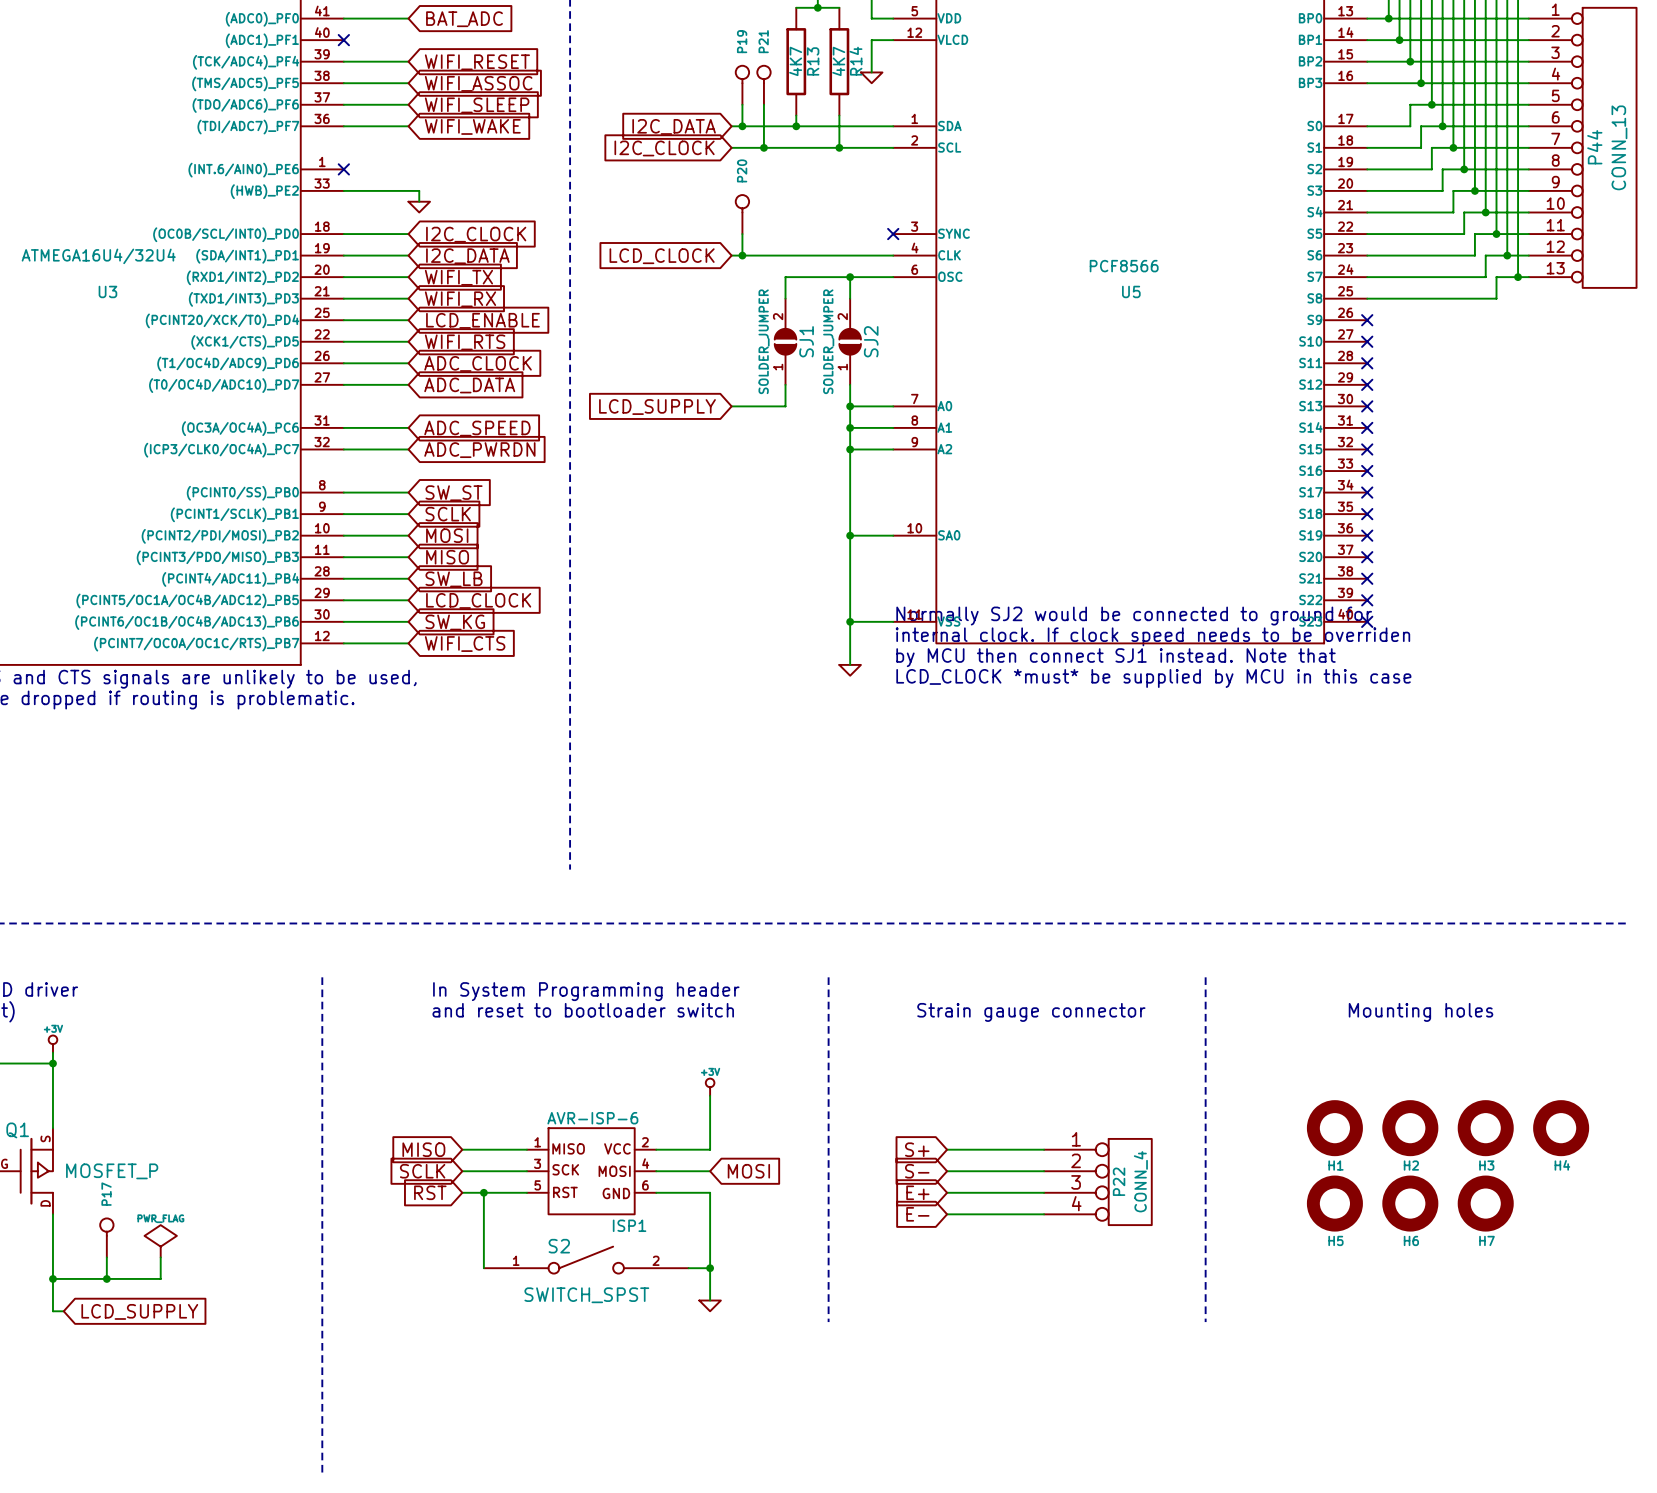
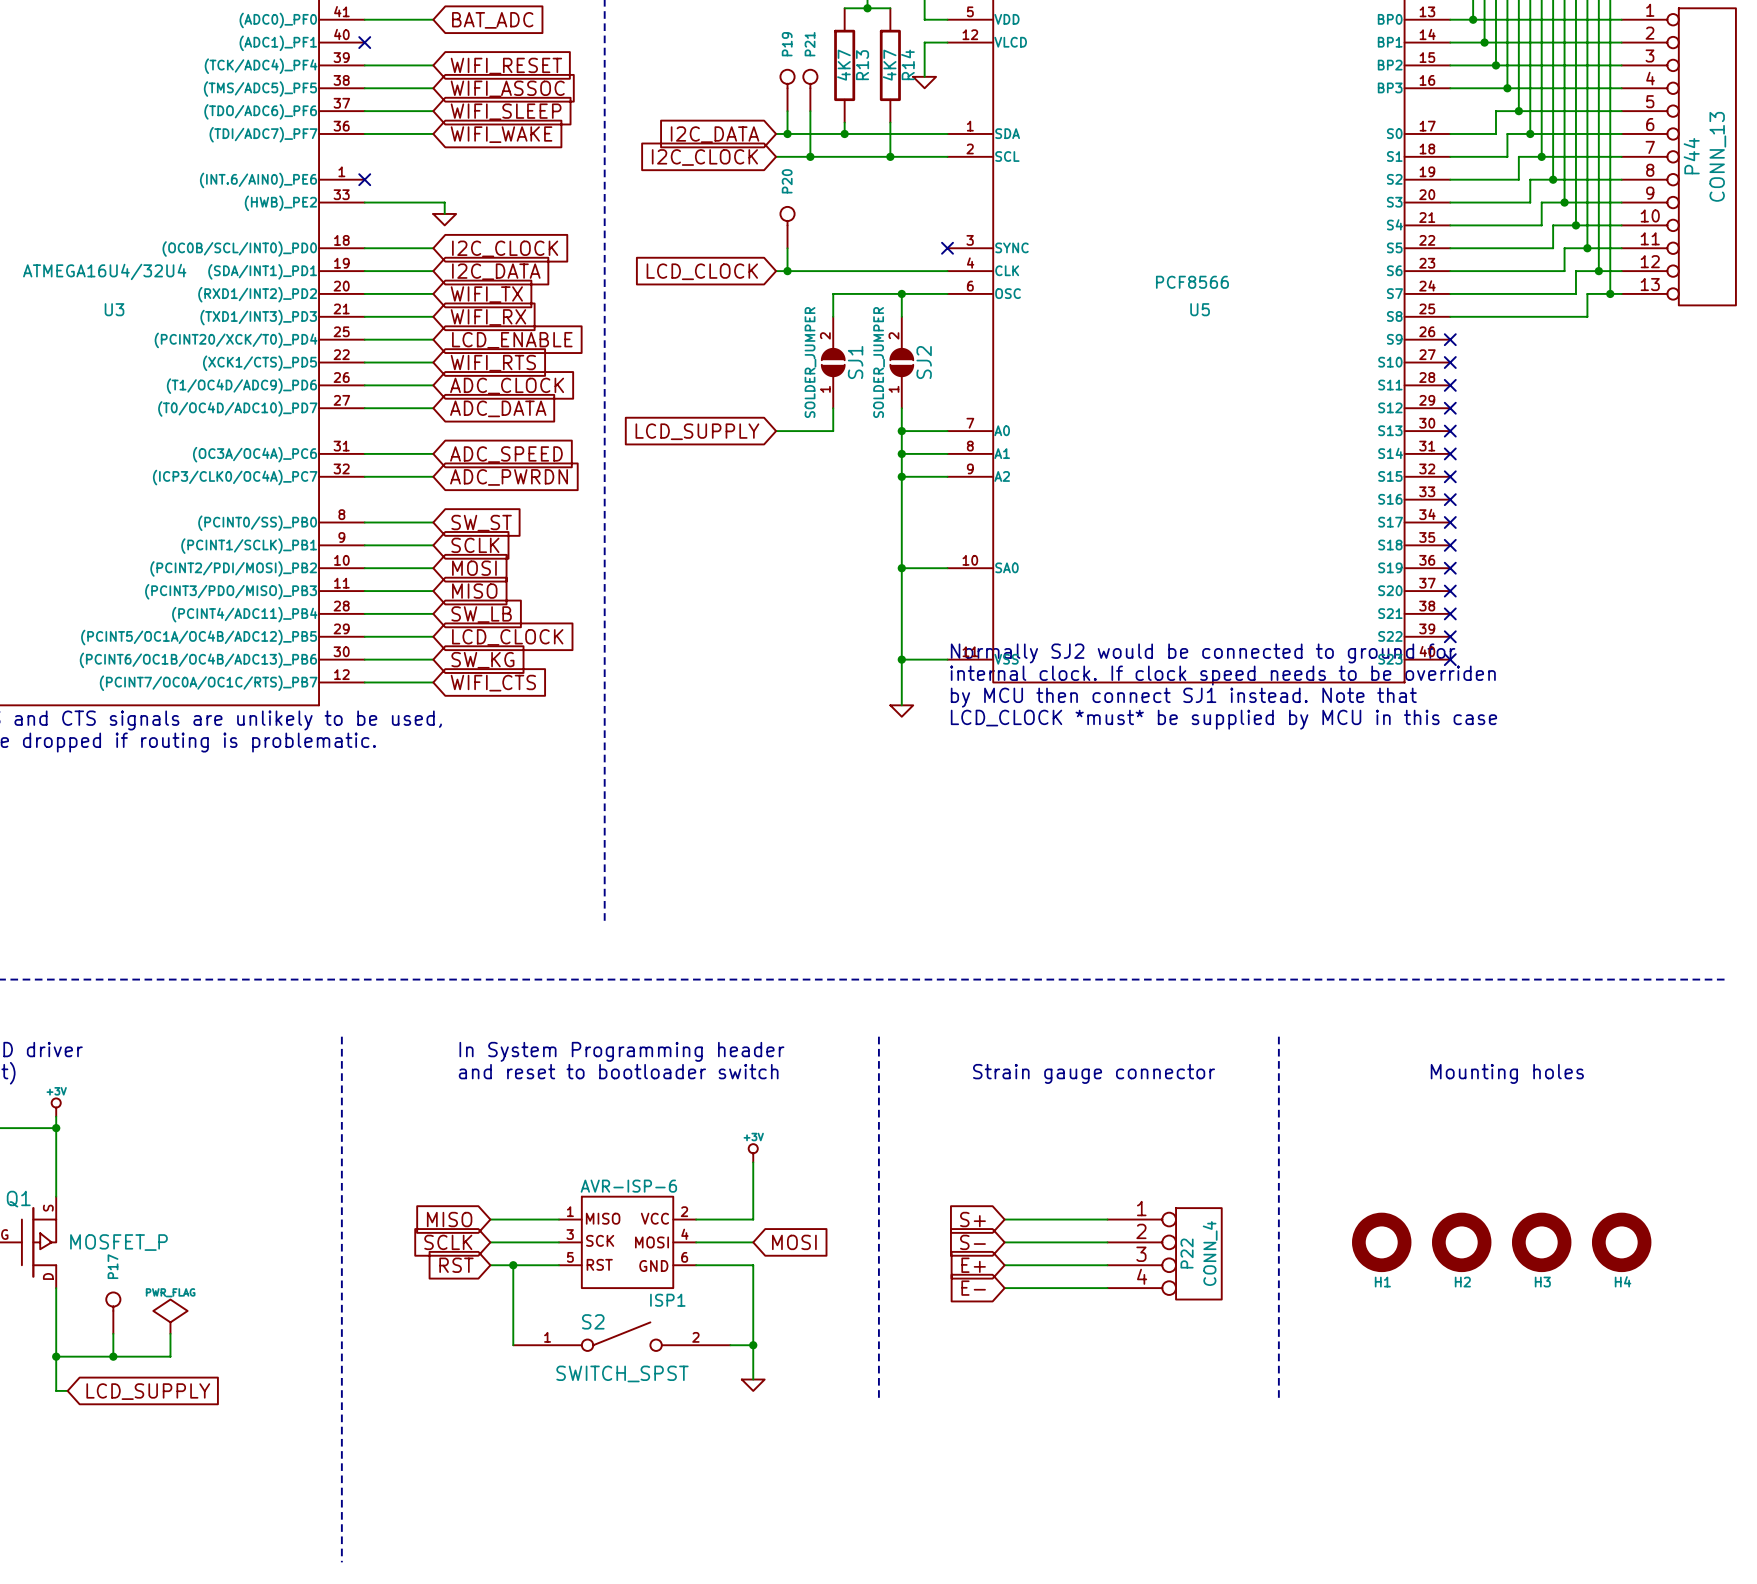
H1 position: (1334, 1128) -> (1381, 1242)
H2 position: (1410, 1128) -> (1461, 1242)
H3 position: (1485, 1128) -> (1541, 1242)
H4 position: (1561, 1128) -> (1621, 1242)
H5: (1334, 1203) -> none
H6: (1410, 1203) -> none
H7: (1485, 1203) -> none

